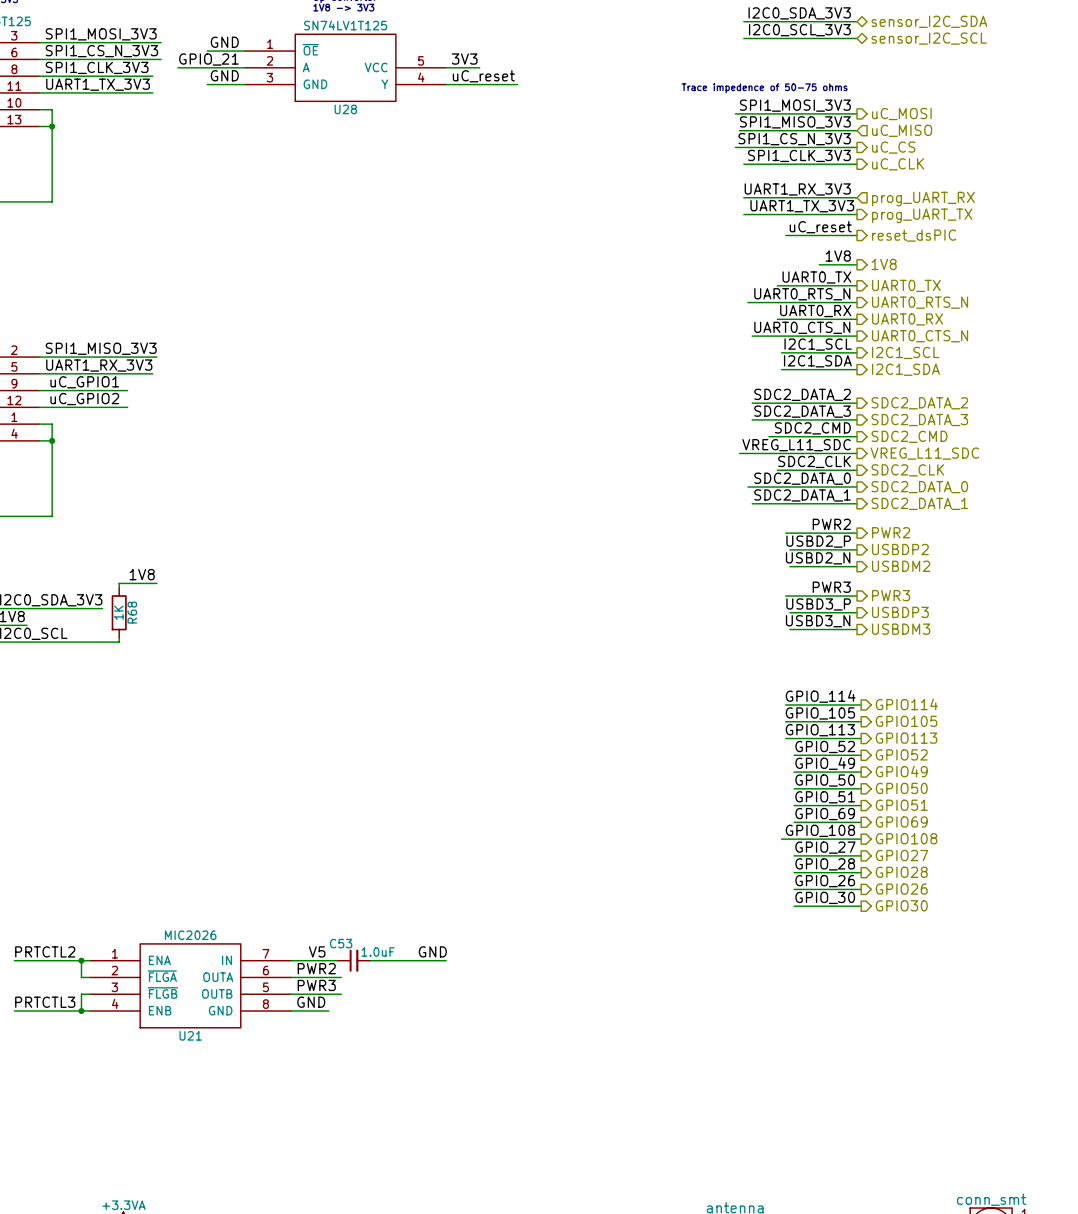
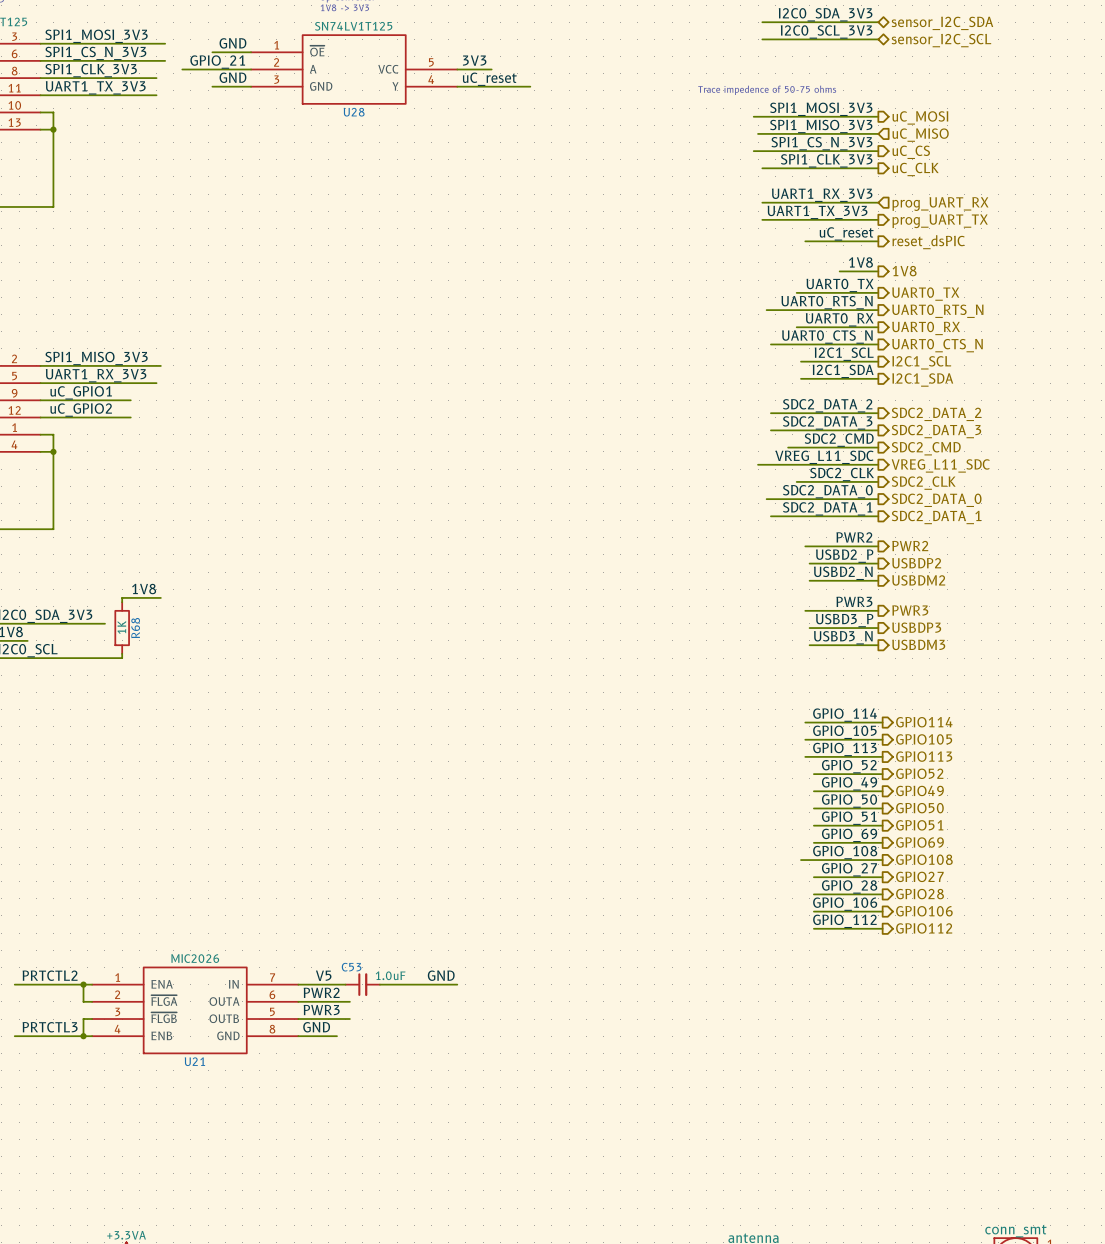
label: GPIO_26 (825, 881) -> GPIO_106 (845, 904)
hierarchical label: GPIO26 (901, 889) -> GPIO106 (924, 911)
label: GPIO_30 (825, 897) -> GPIO_112 (844, 921)
hierarchical label: GPIO30 (901, 905) -> GPIO112 (924, 928)

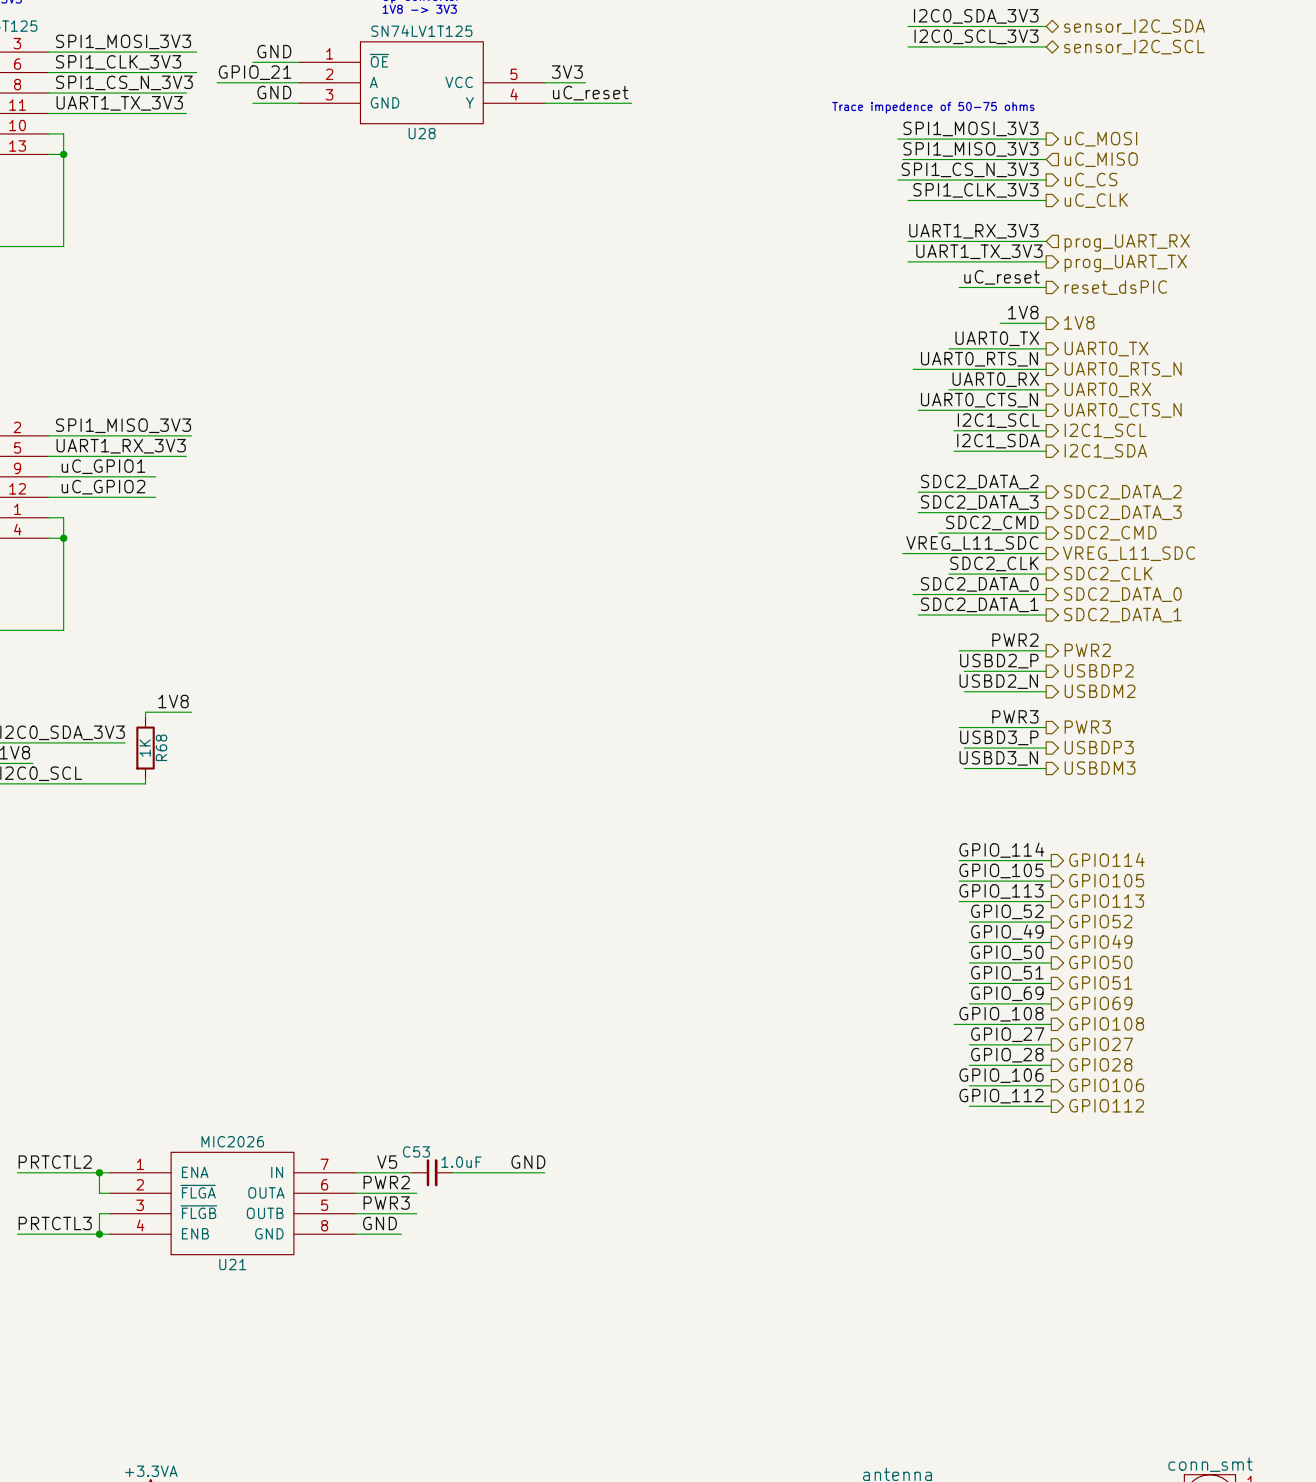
label: SPI1_CS_N_3V3 (95, 53) -> SPI1_CLK_3V3 (118, 62)
label: SPI1_CLK_3V3 (91, 70) -> SPI1_CS_N_3V3 (124, 82)

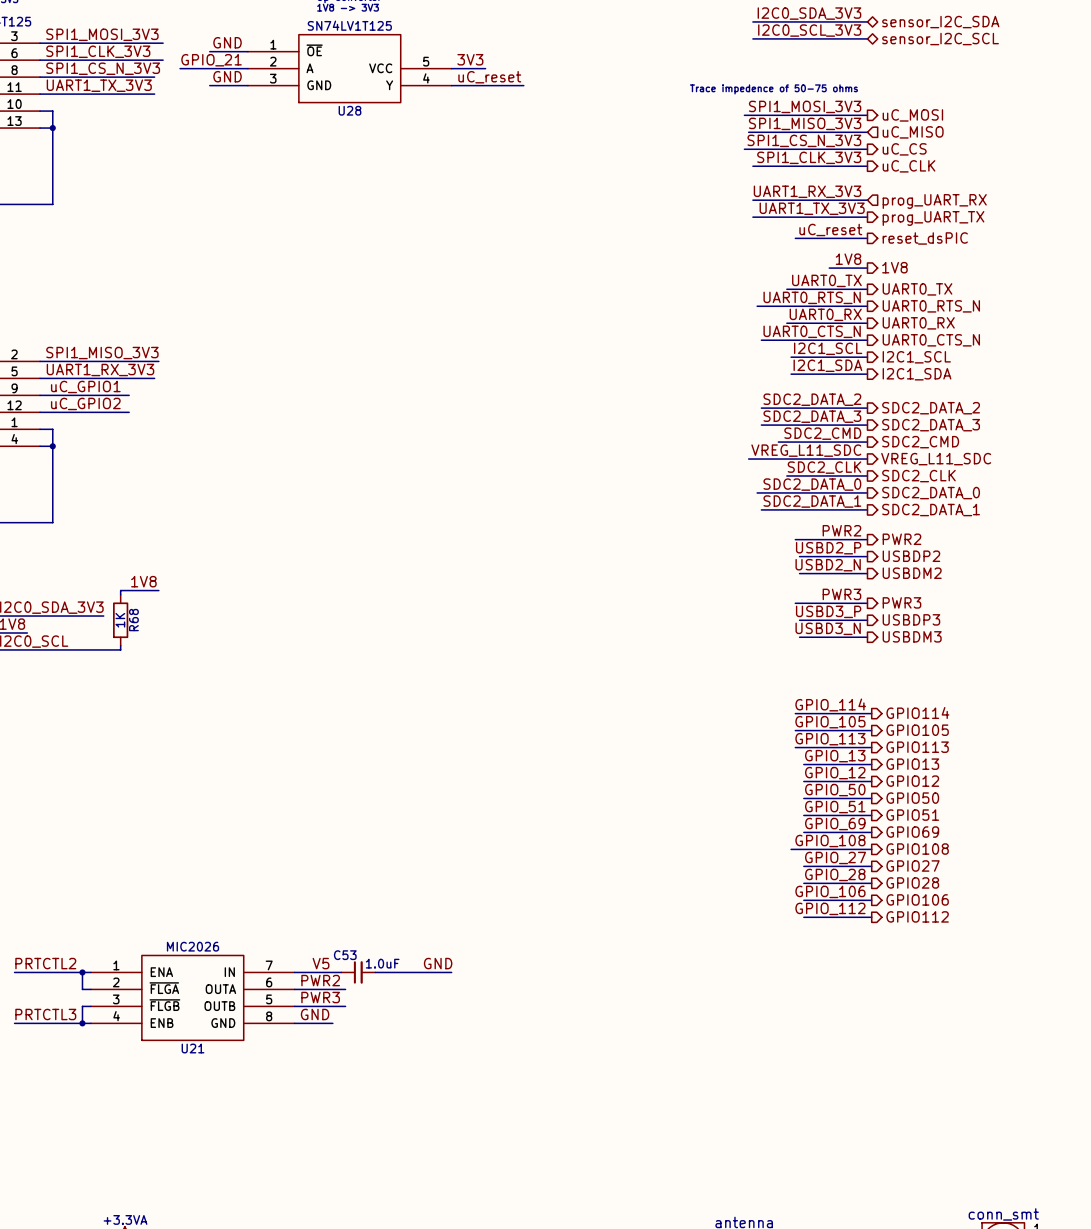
label: GPIO_52 (1007, 911) -> GPIO_13 (835, 756)
hierarchical label: GPIO52 (1100, 921) -> GPIO13 (912, 764)
label: GPIO_49 (1007, 932) -> GPIO_12 (835, 773)
hierarchical label: GPIO49 (1100, 941) -> GPIO12 (912, 781)

